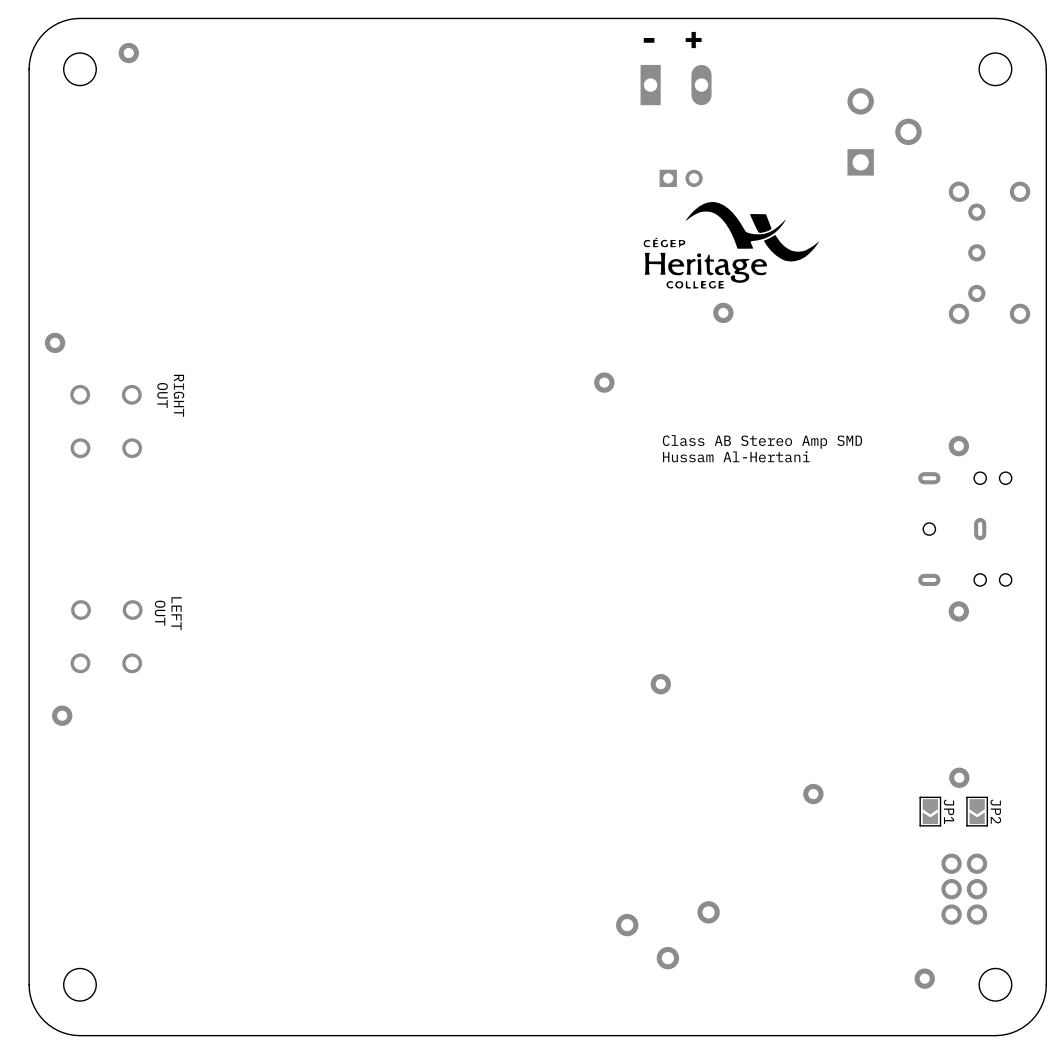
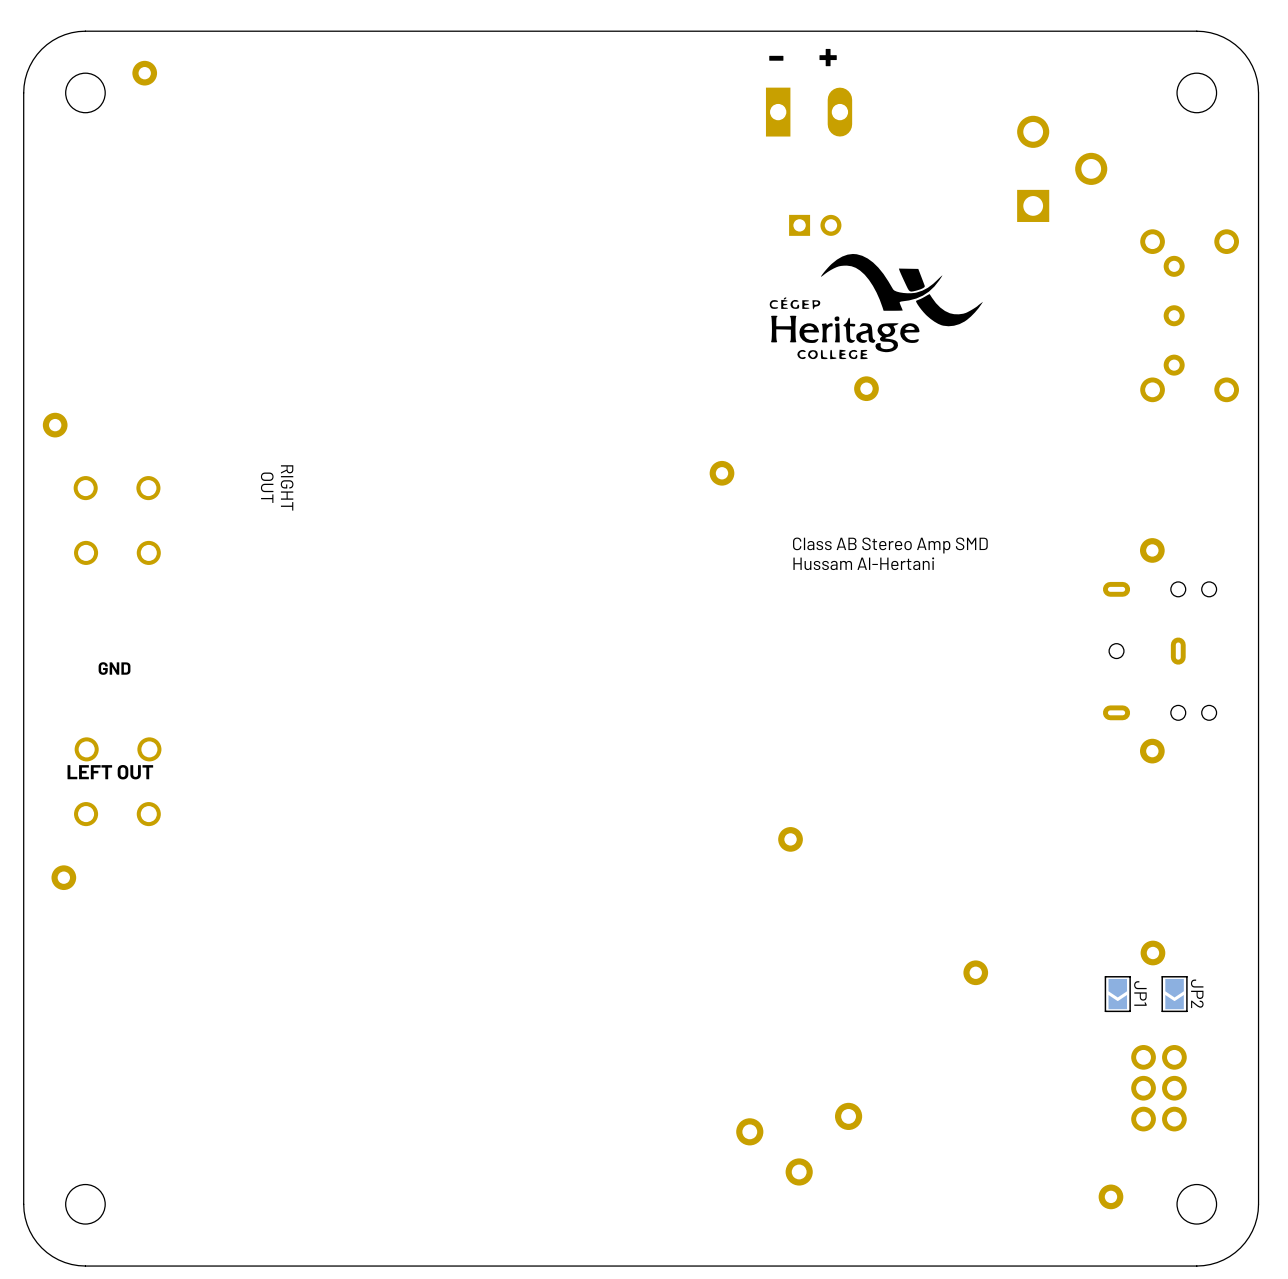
text position: OUT (162, 395) -> OUT (267, 487)
text position: RIGHT (178, 395) -> RIGHT (287, 487)
text: none -> GND (114, 668)
text: OUT (160, 613) -> none
text: LEFT (176, 613) -> none
text: none -> LEFT OUT (110, 772)

